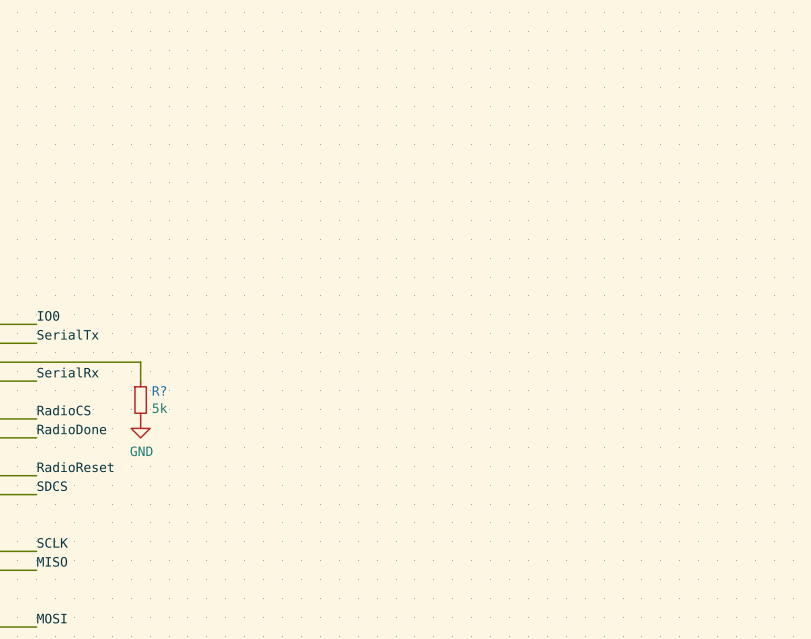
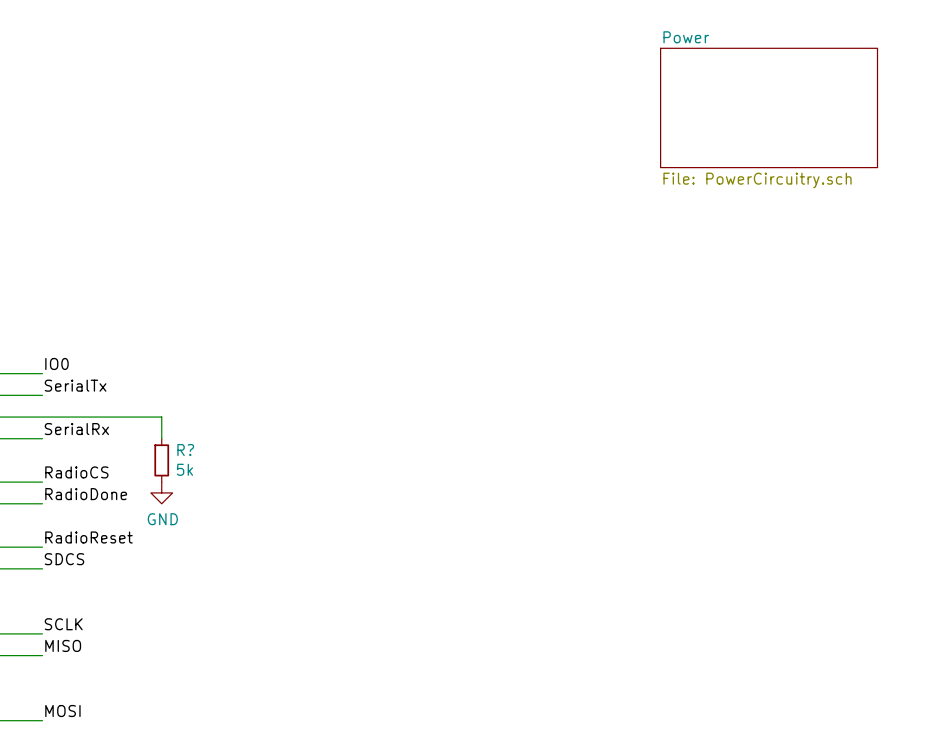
sheet Power: none -> File: PowerCircuitry.sch (769, 107)

